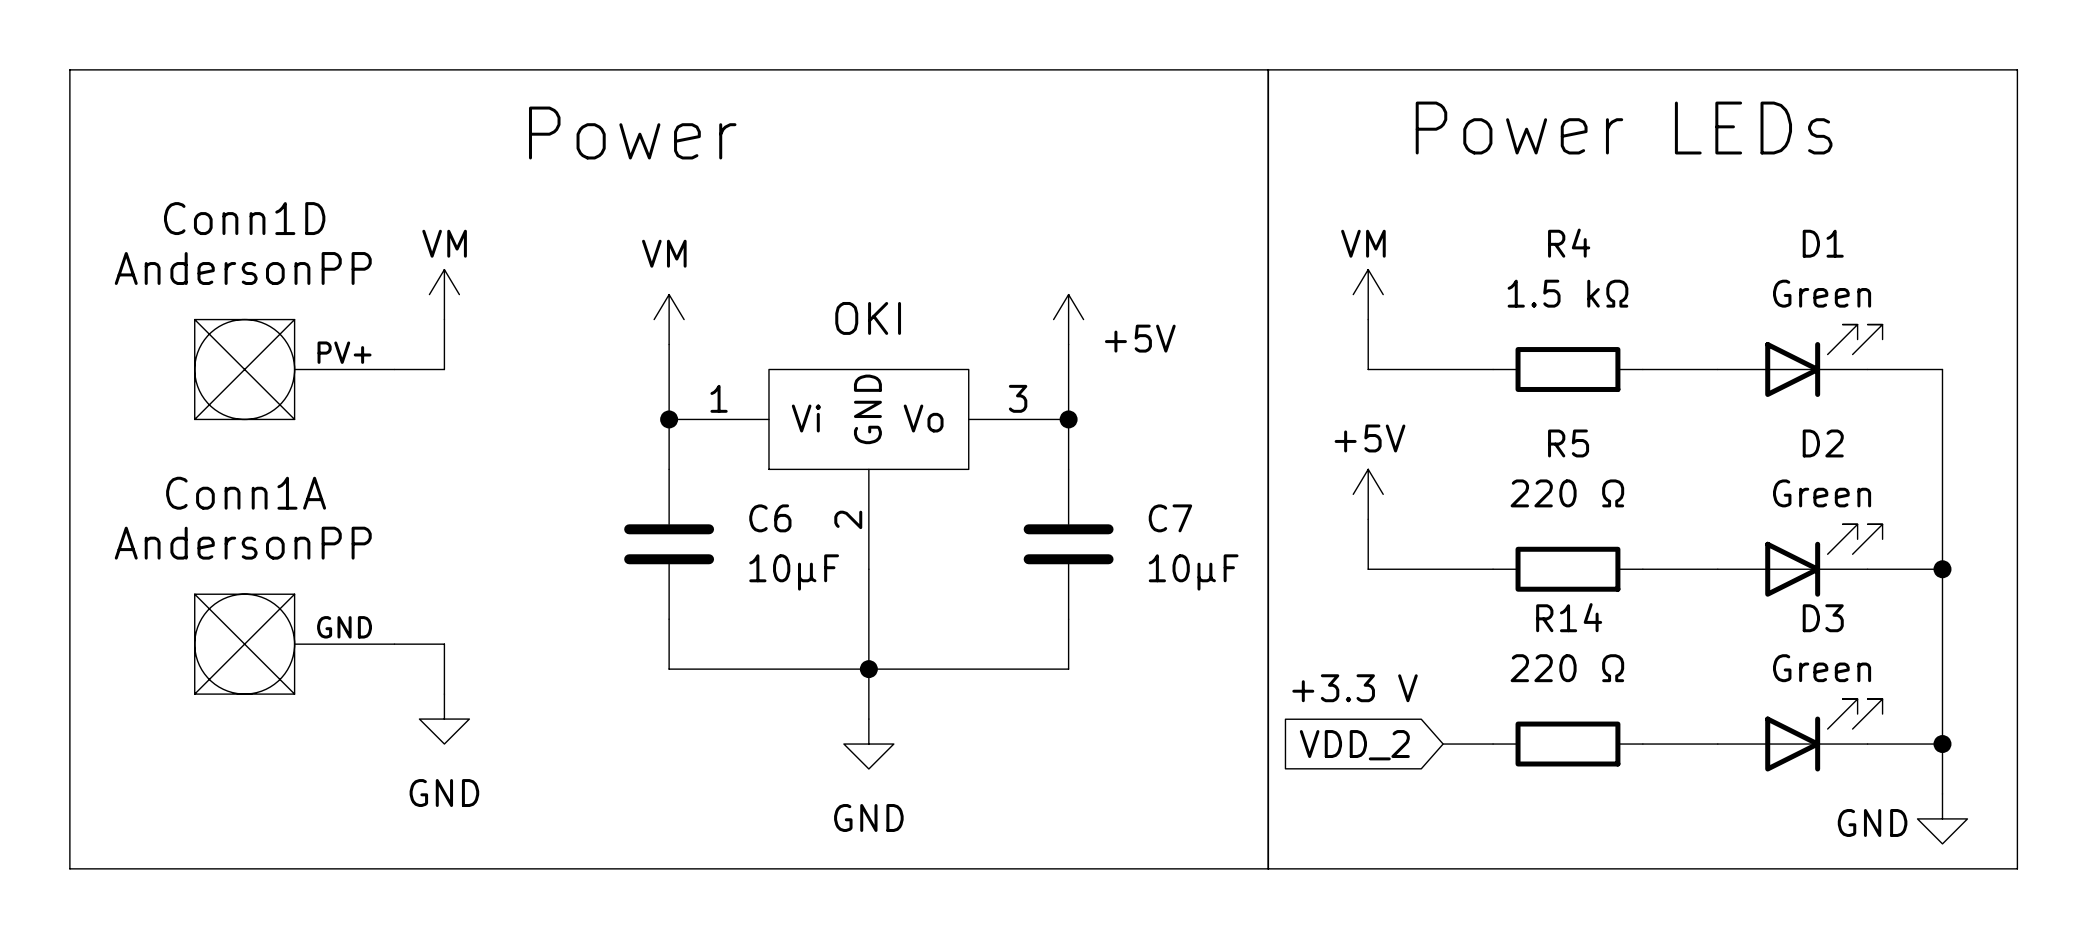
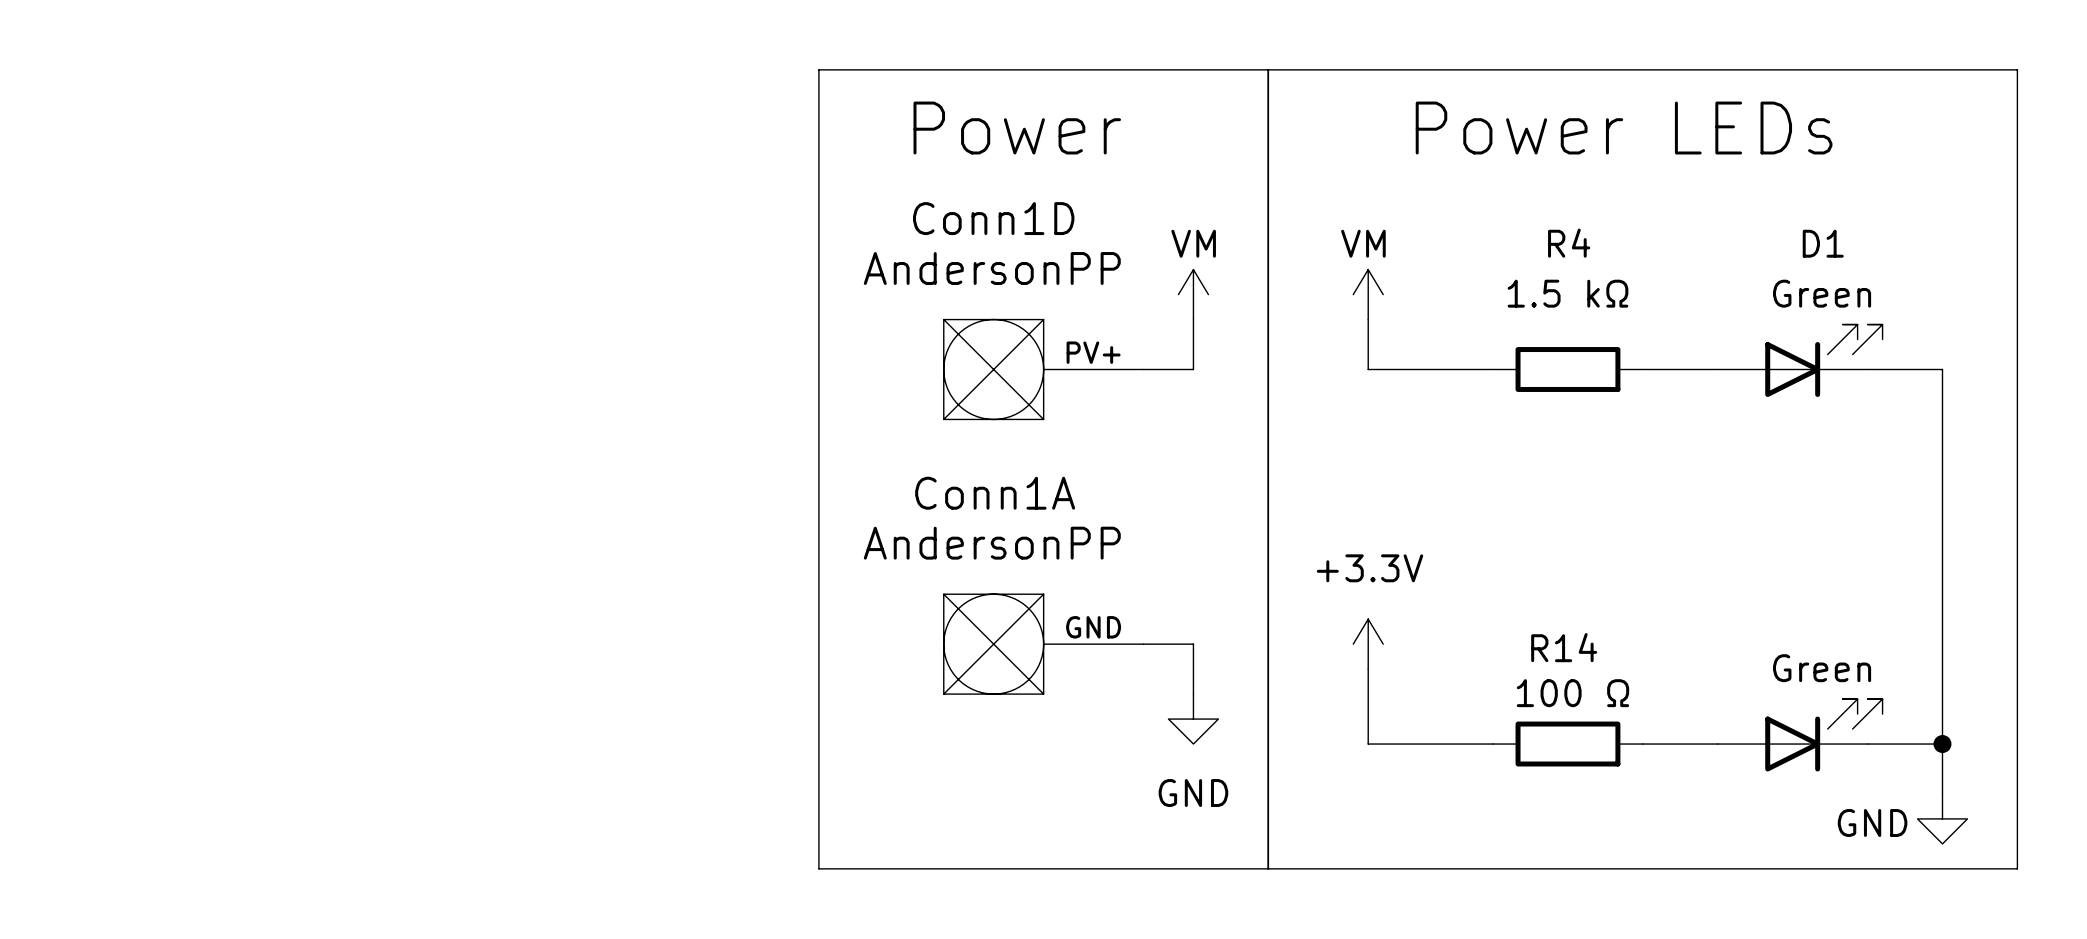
line: (818, 69) (69, 69) (69, 868) (818, 868) -> (818, 69) (818, 868)
text position: Power (632, 133) -> Power (1017, 128)
power symbol: VM (444, 294) -> none
power symbol: none -> VM (1193, 294)
wire: (444, 319) (444, 369) (394, 369) -> none
power symbol: VM (669, 319) -> none
power symbol: +5V (1068, 319) -> none
wire: none -> (1193, 319) (1193, 369) (1143, 369)
wire: (669, 344) (669, 469) -> none
wire: (1068, 344) (1068, 469) -> none
Conn1D position: (294, 369) -> (1043, 369)
junction: (669, 419) -> none
junction: (1068, 419) -> none
part: OKI (868, 469) -> none
power symbol: +5V (1368, 494) -> none
wire: (1368, 519) (1368, 569) (1493, 569) -> none
C6: 10µF (669, 544) -> none
C7: 10µF (1068, 544) -> none
D2: Green (1800, 560) -> none
wire: (868, 569) (868, 719) -> none
R5: 220 Ω (1567, 569) -> none
wire: (1642, 569) (1717, 569) -> none
wire: (1867, 569) (1942, 569) -> none
junction: (1942, 569) -> none
R14 name position: R14 (1569, 617) -> R14 (1564, 647)
D3 name: D3 (1823, 618) -> none
wire: (669, 619) (669, 669) (1068, 669) (1068, 619) -> none
Conn1A position: (294, 644) -> (1043, 644)
wire: (394, 644) (444, 644) (444, 694) -> none
wire: none -> (1143, 644) (1193, 644) (1193, 694)
power symbol: none -> +3.3V (1368, 644)
R14 value: 220 Ω (1567, 668) -> 100 Ω (1572, 693)
junction: (868, 669) -> none
wire: none -> (1368, 669) (1368, 744) (1443, 744)
text: +3.3 V (1355, 688) -> none
power symbol: GND (444, 719) -> none
power symbol position: GND (868, 744) -> GND (1193, 719)
global label: VDD_2 (1354, 745) -> none

